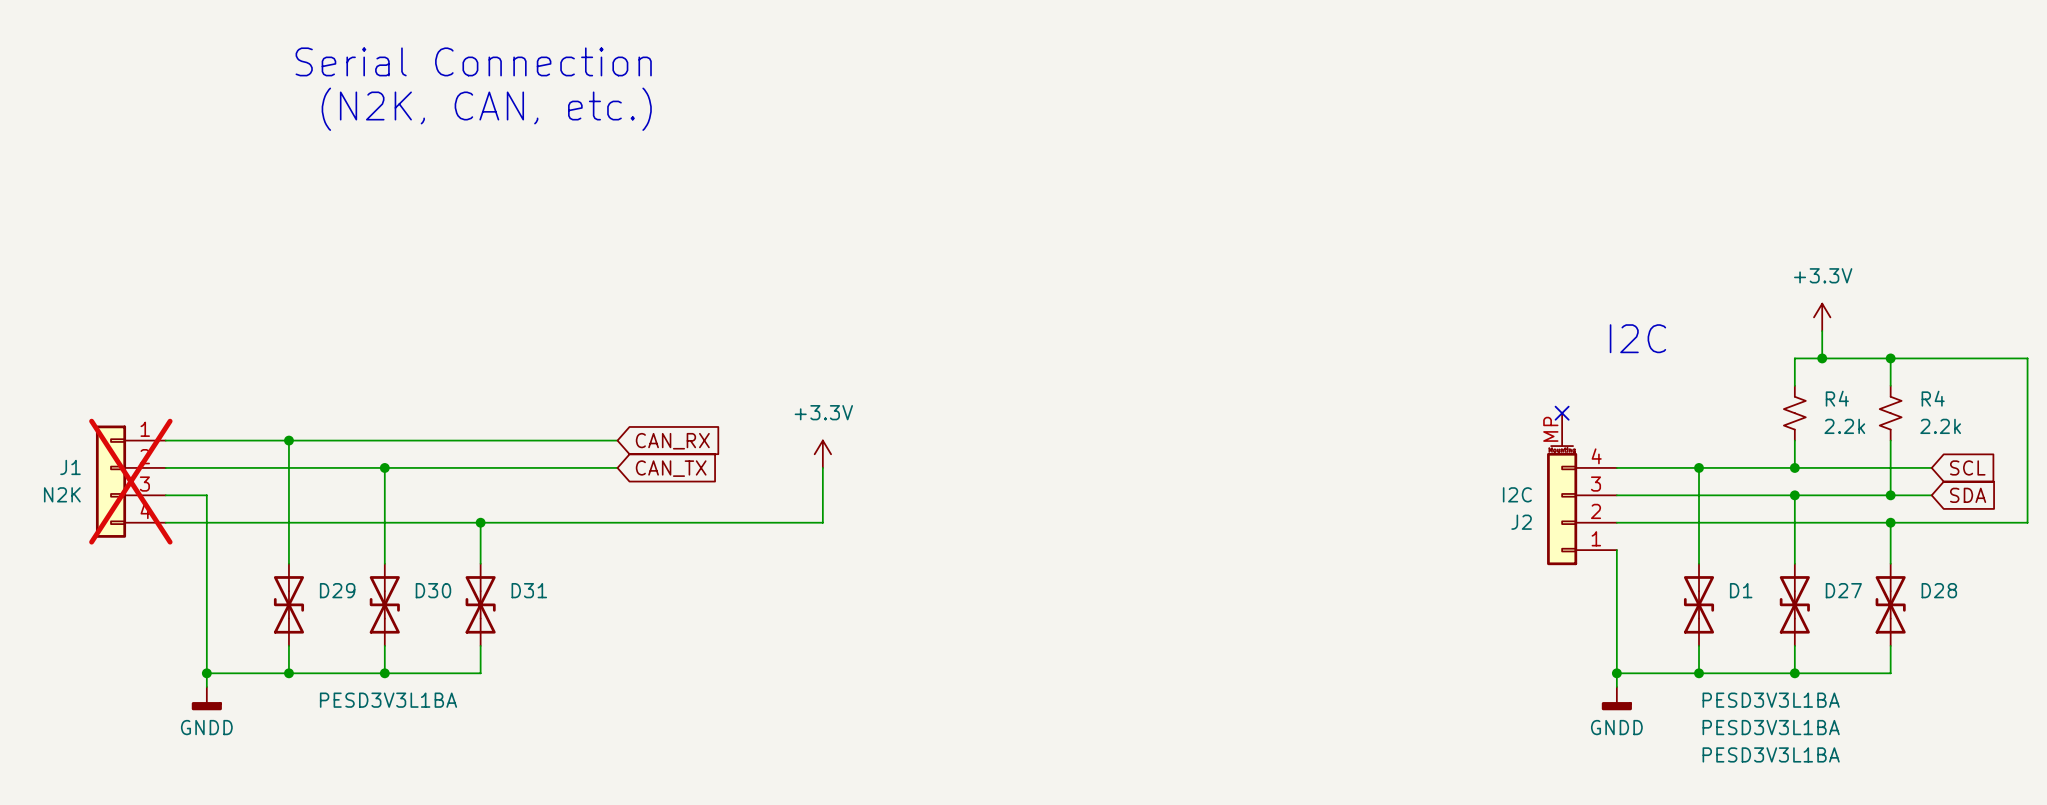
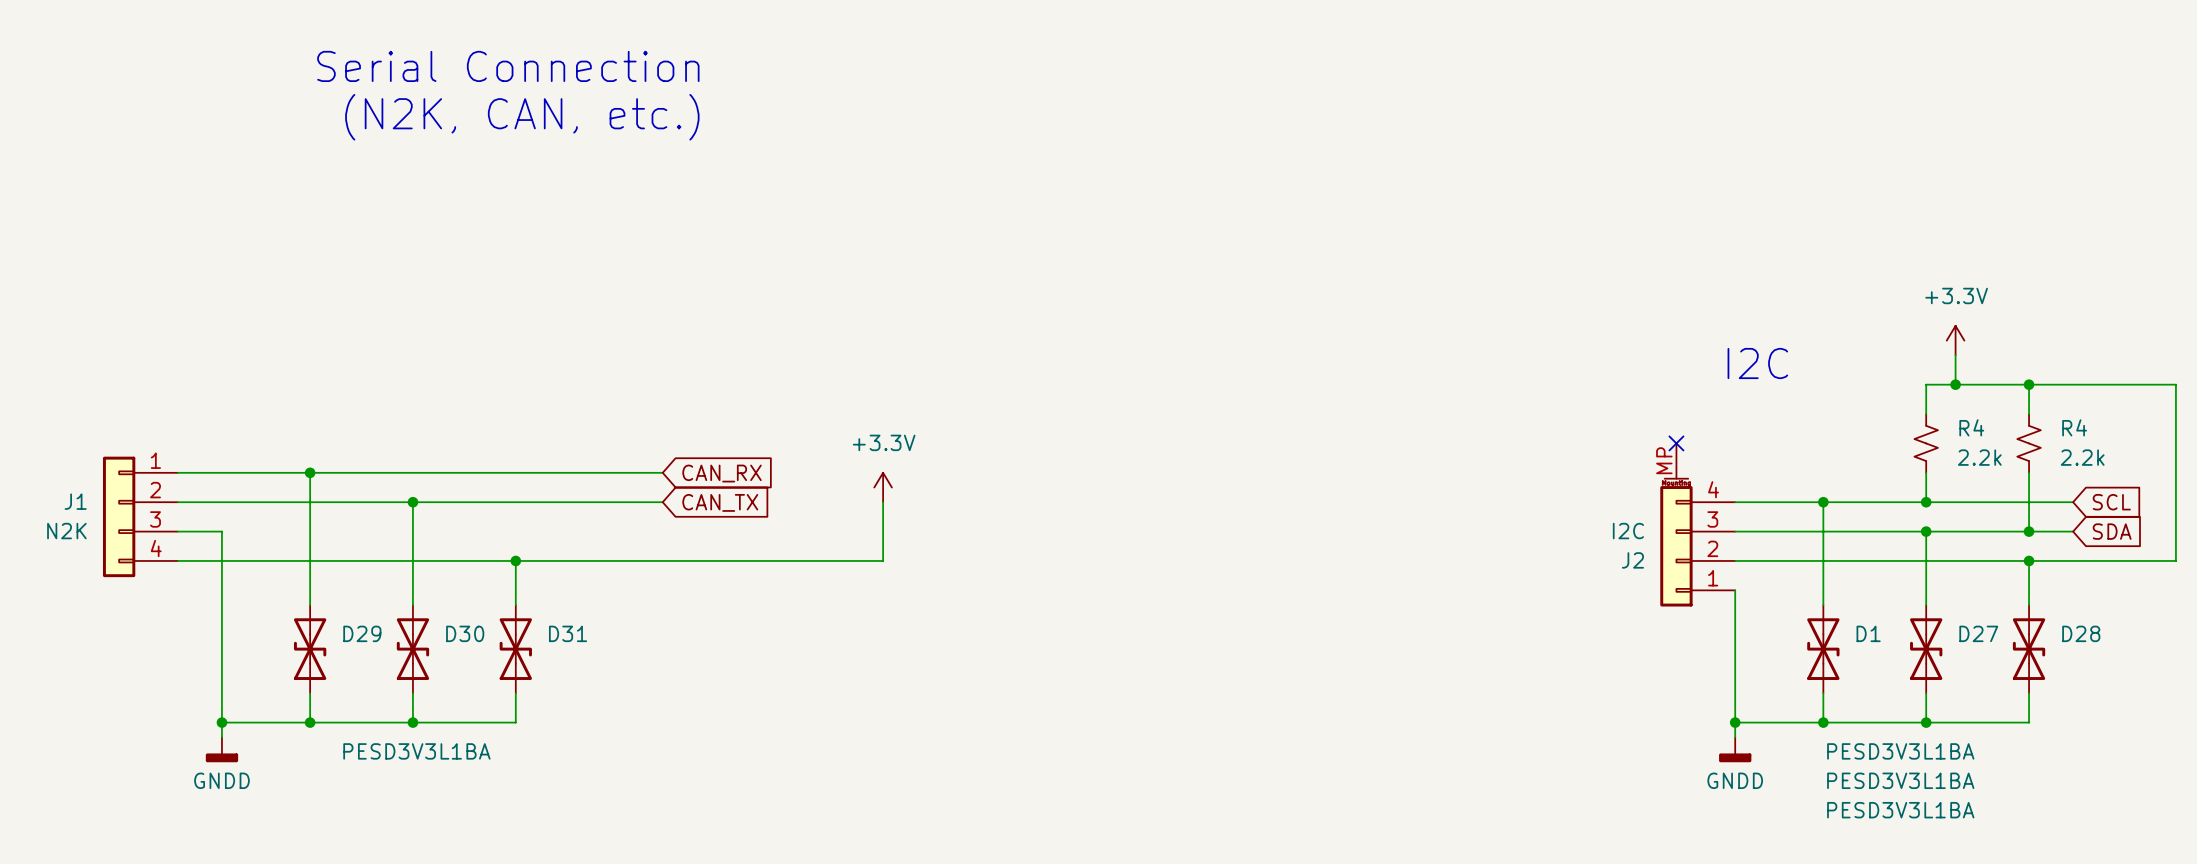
J1 do-not-place cross: (130, 481) -> none

